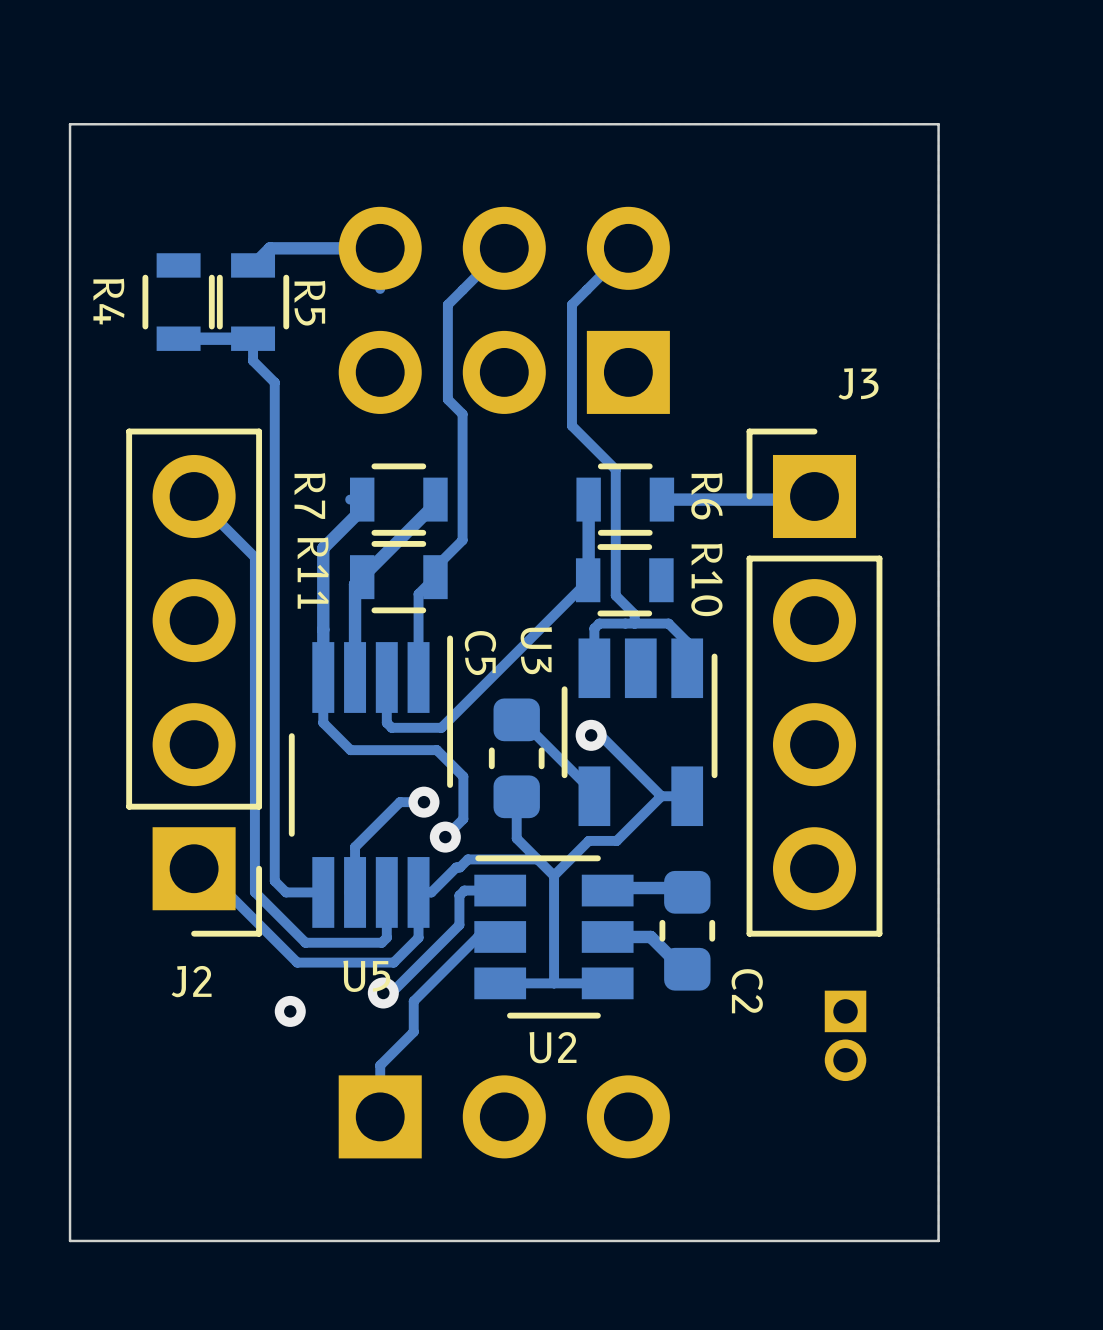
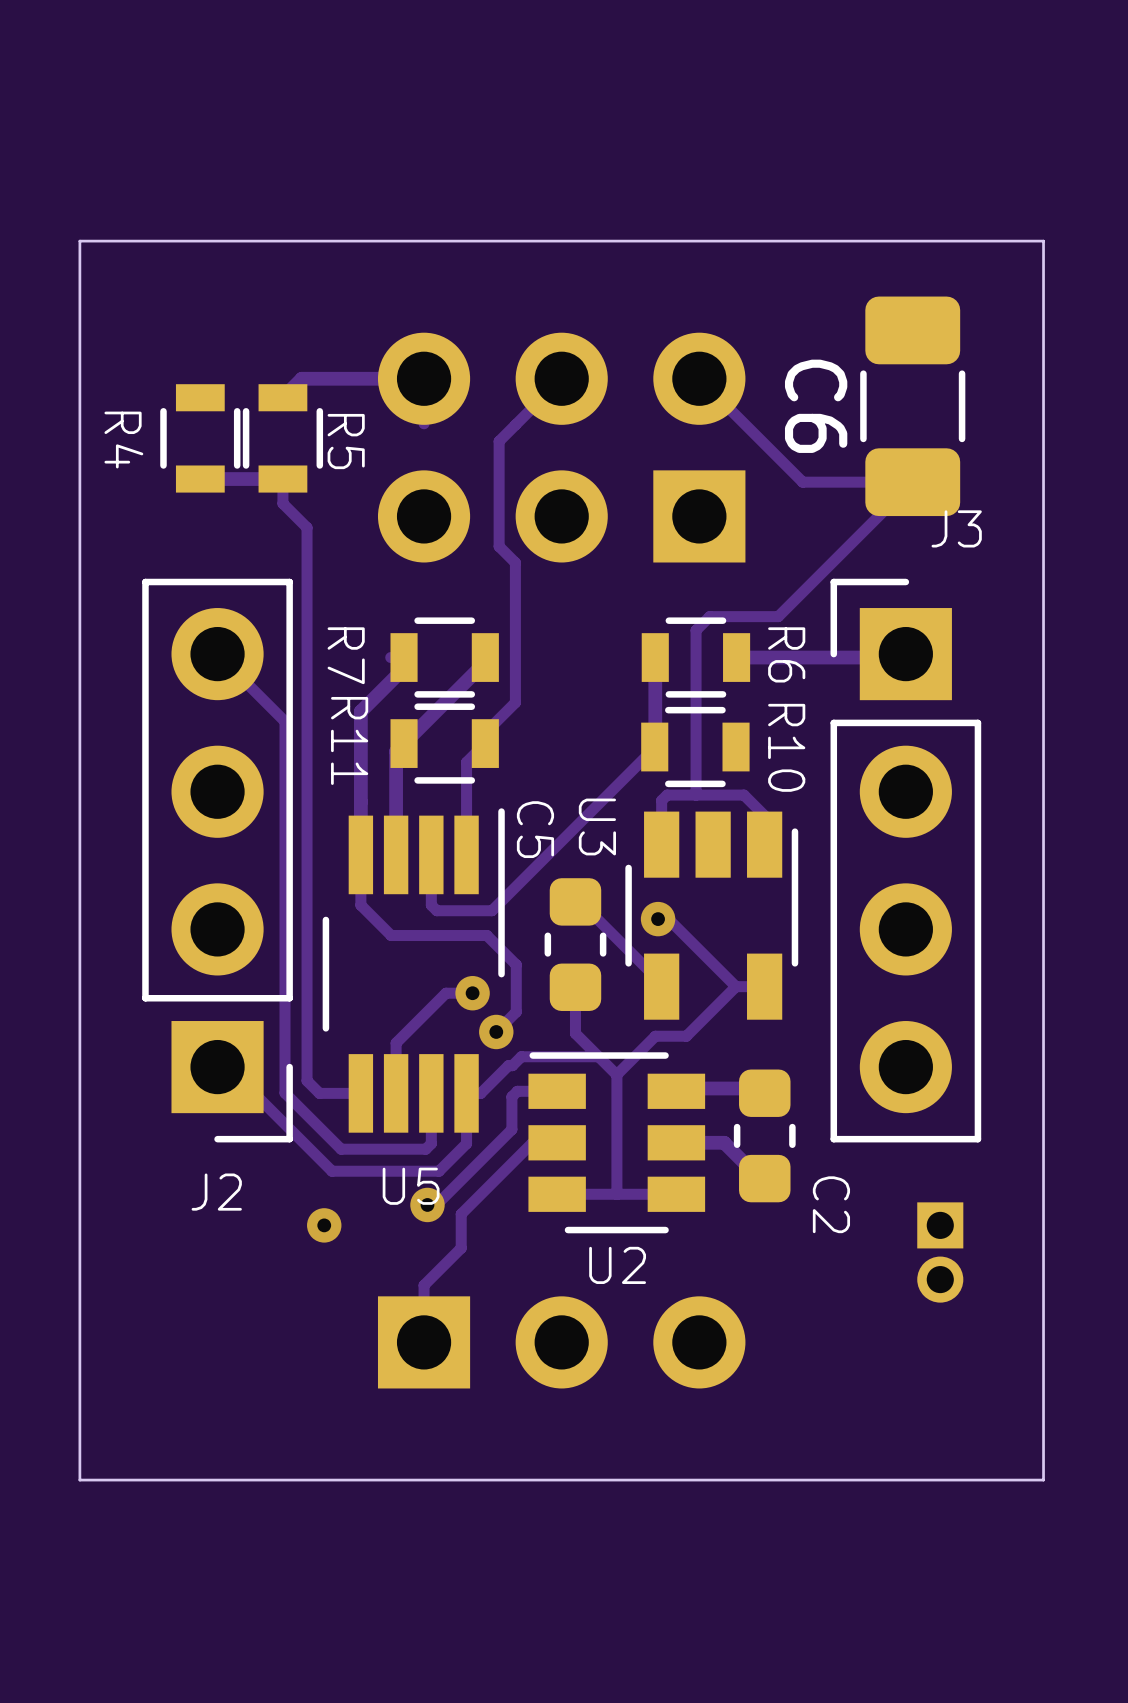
track: (628, 248) (571, 304) (571, 425) (615, 469) (615, 595) (634, 614) (634, 623) -> (699, 378) (802, 482) (912, 482) (778, 616) (709, 616) (696, 630) (696, 795)
C6: none -> (912, 406)

